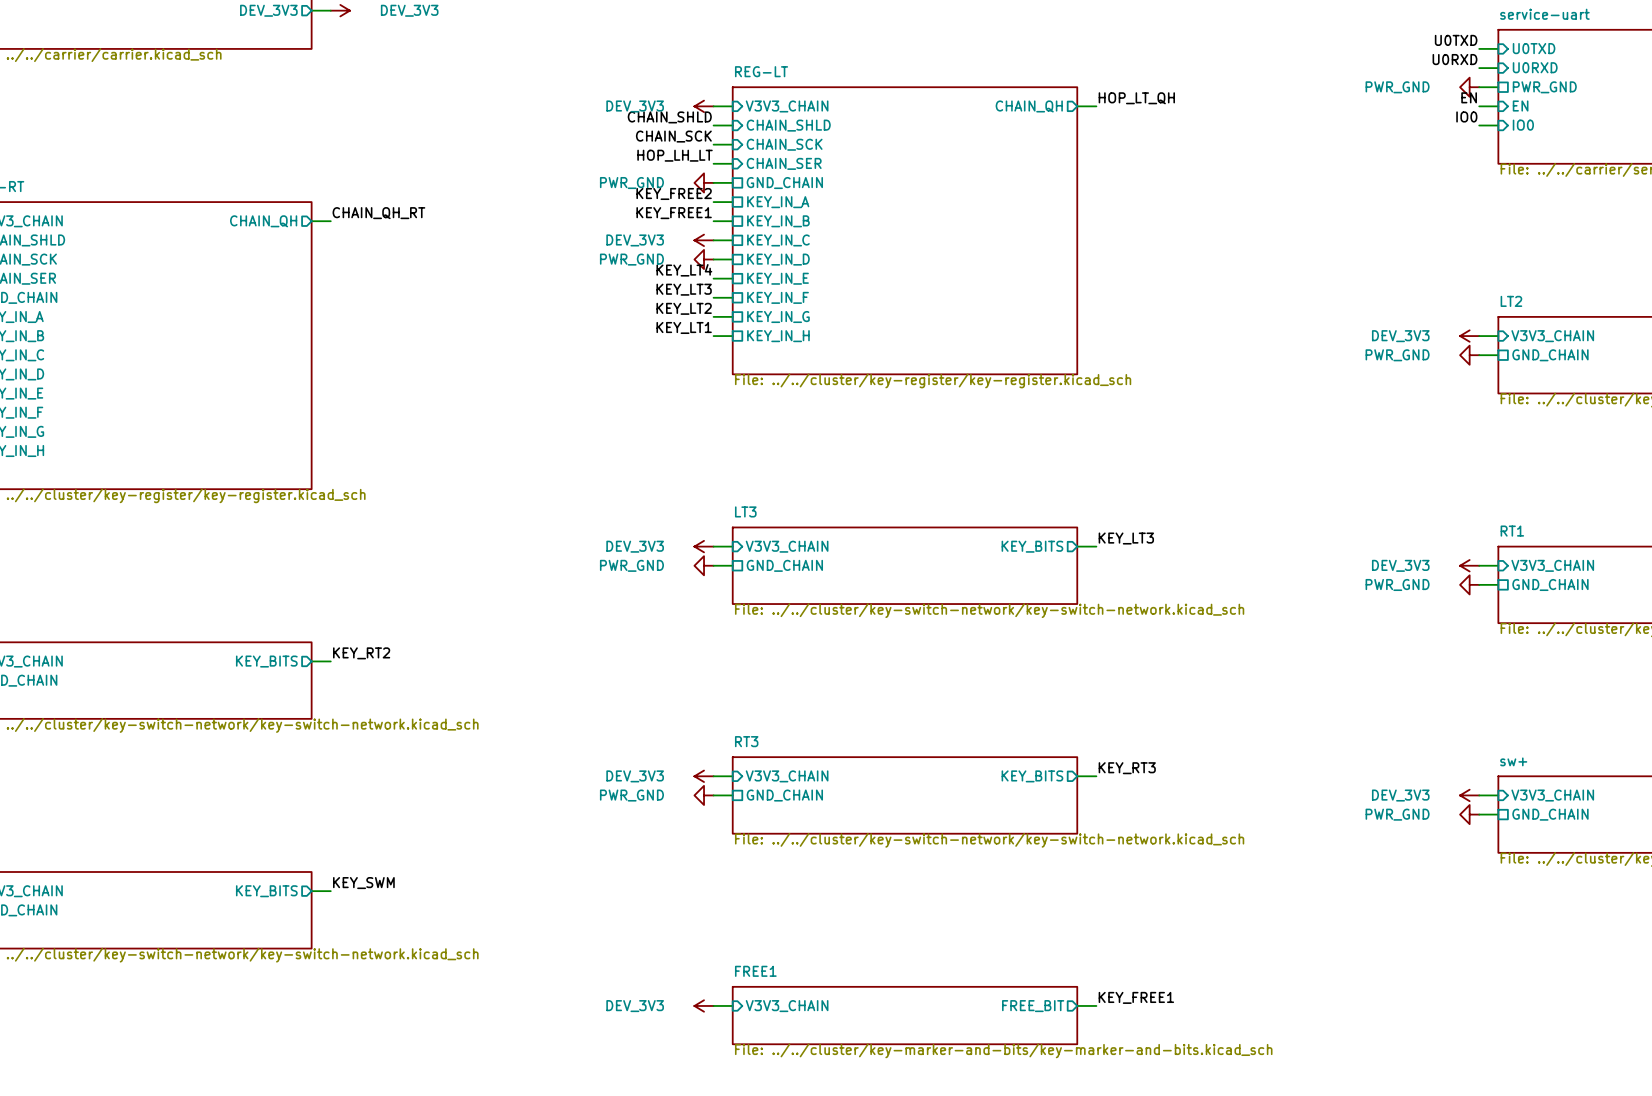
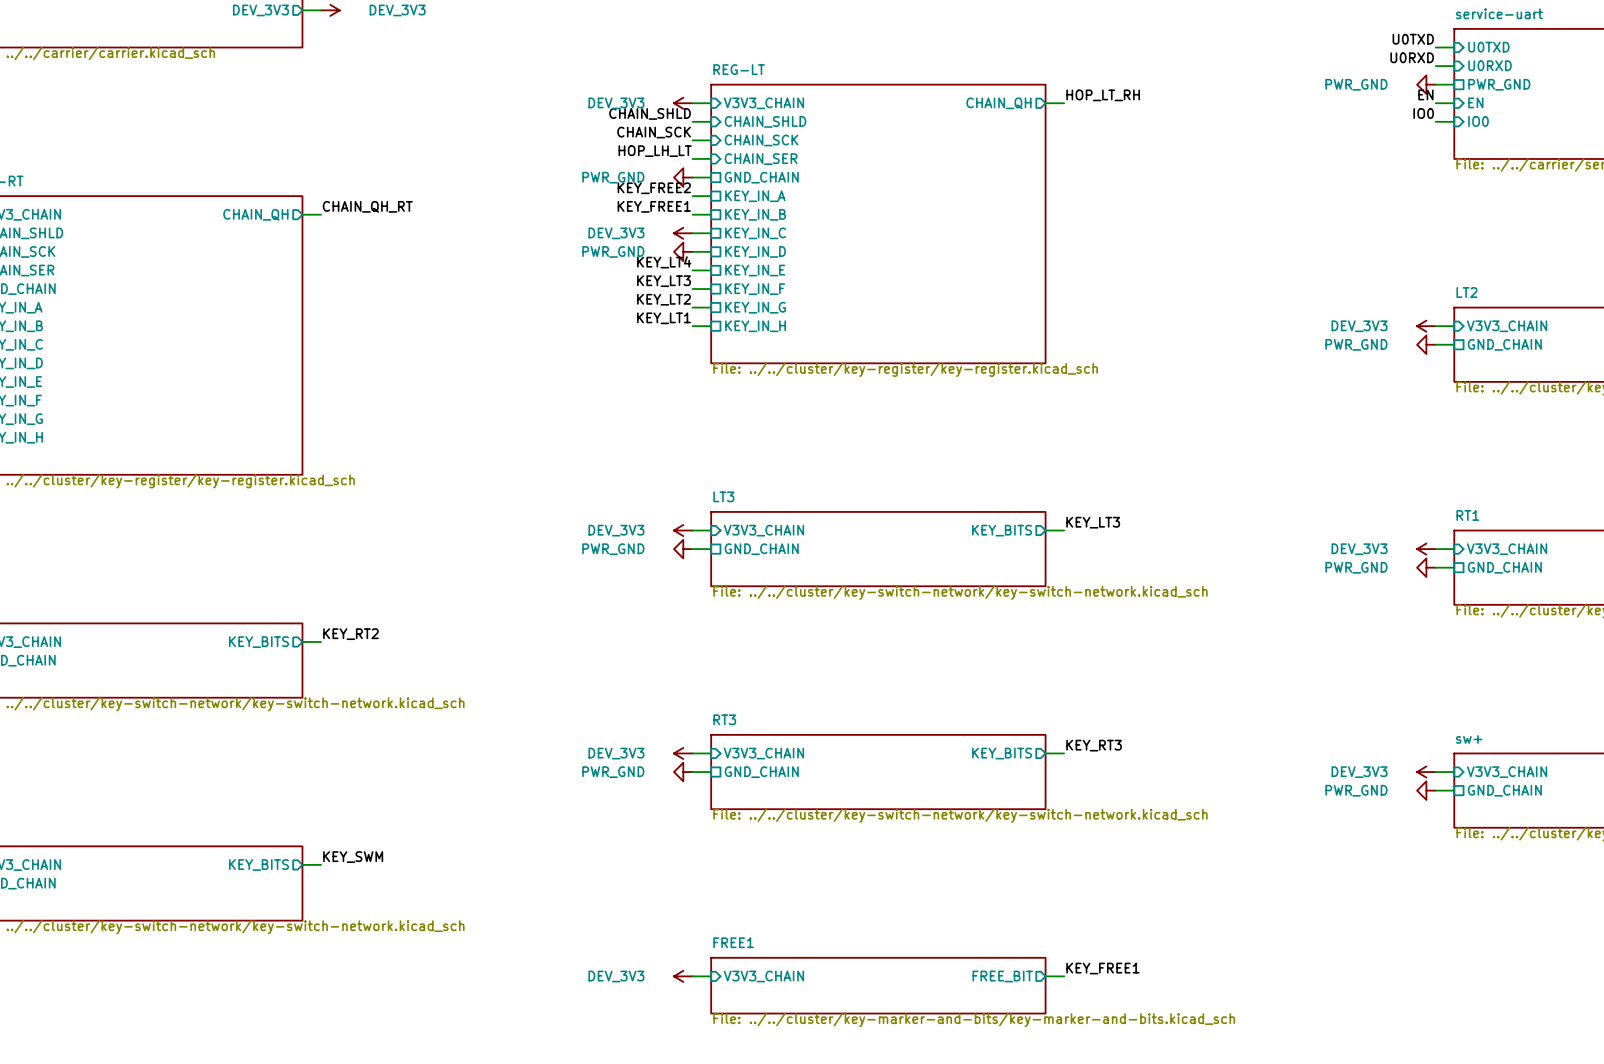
label: HOP_LT_QH (1136, 98) -> HOP_LT_RH (1103, 95)

